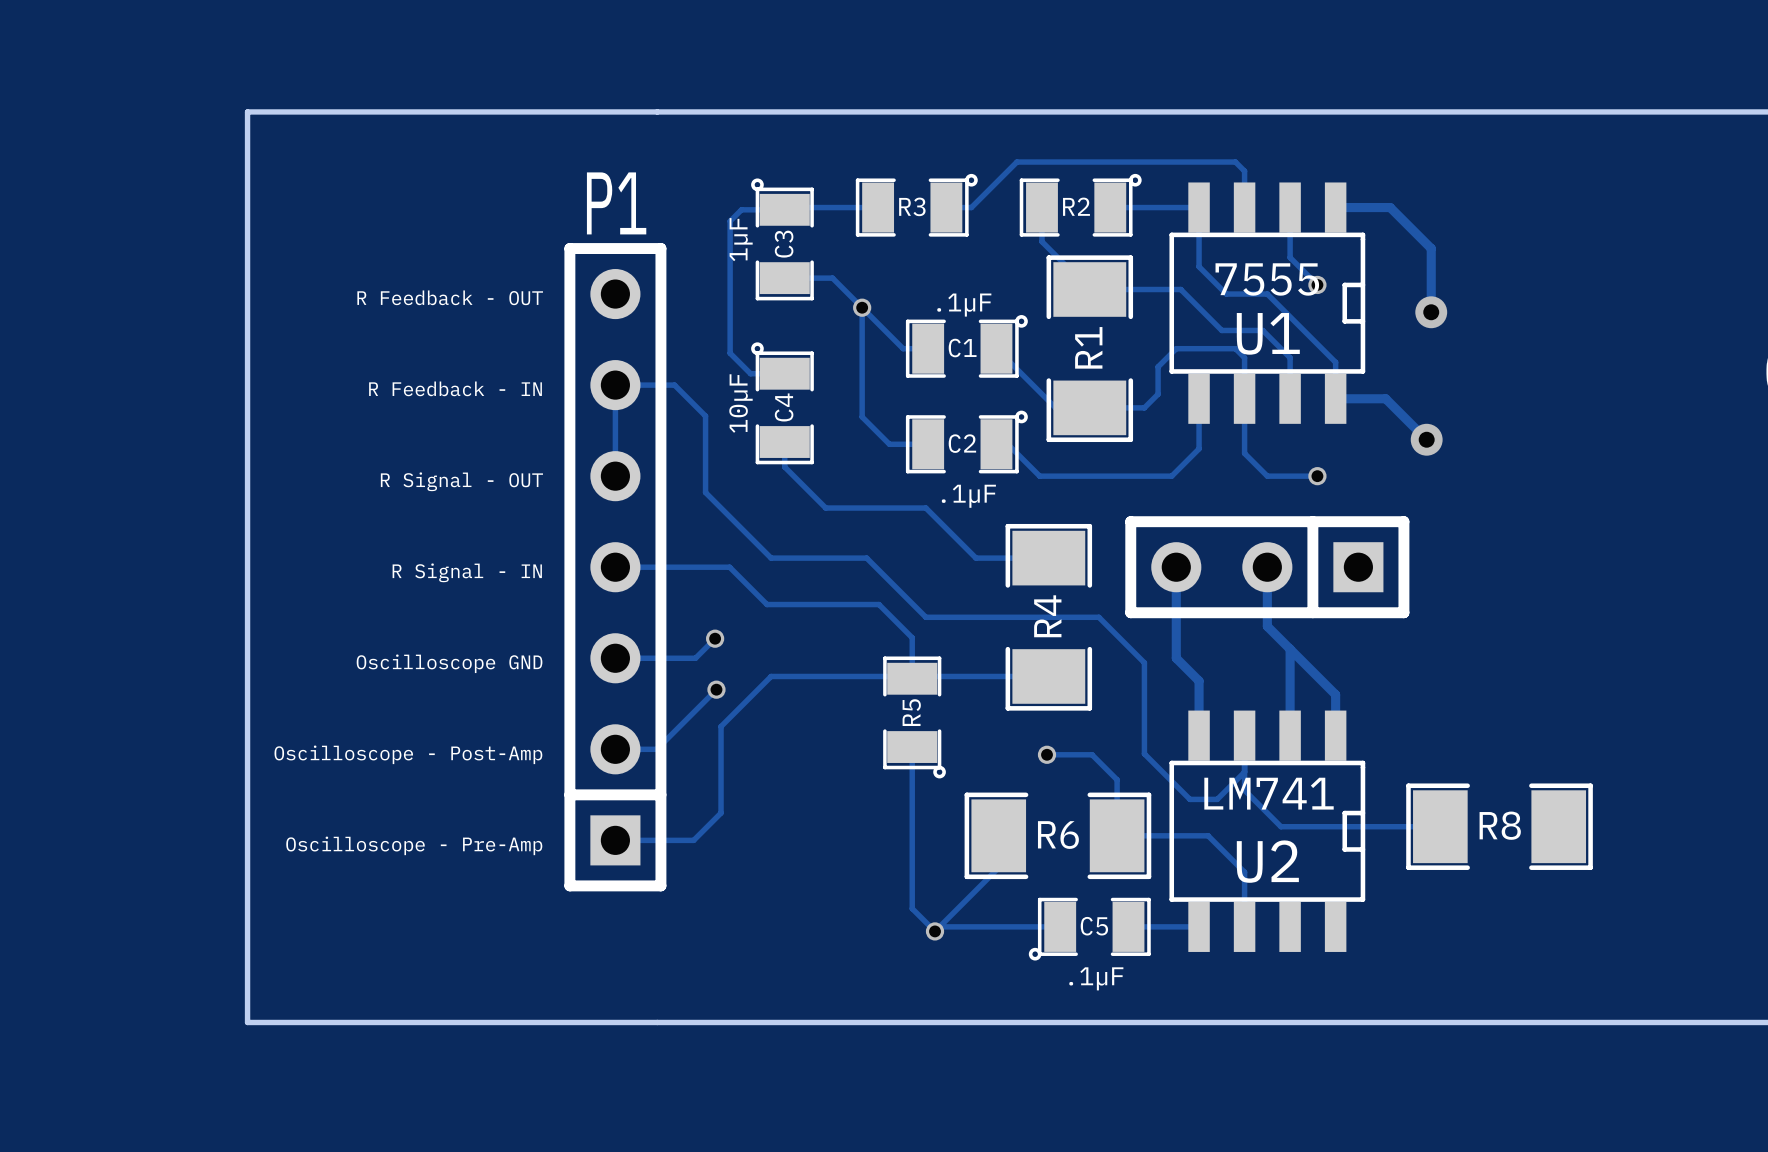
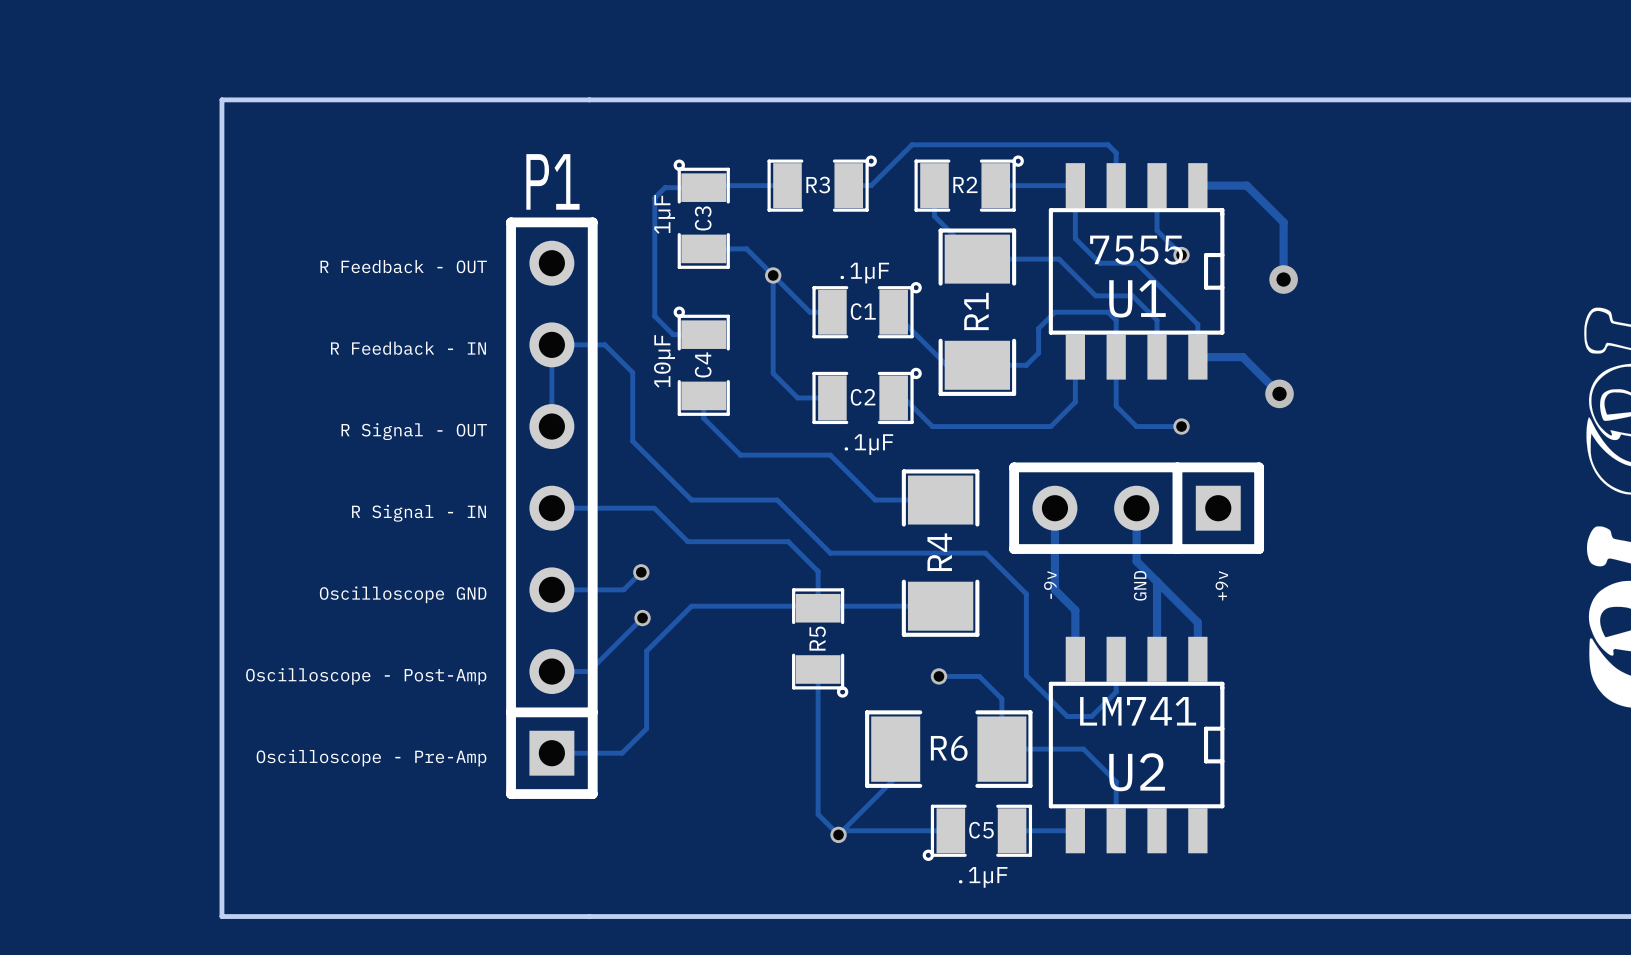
text: none -> -9v (1050, 584)
text: none -> GND (1140, 585)
text: none -> +9v (1221, 585)
track: (1244, 772) (1244, 790) (1281, 826) (1440, 826) -> none
R8: (1499, 826) -> none

